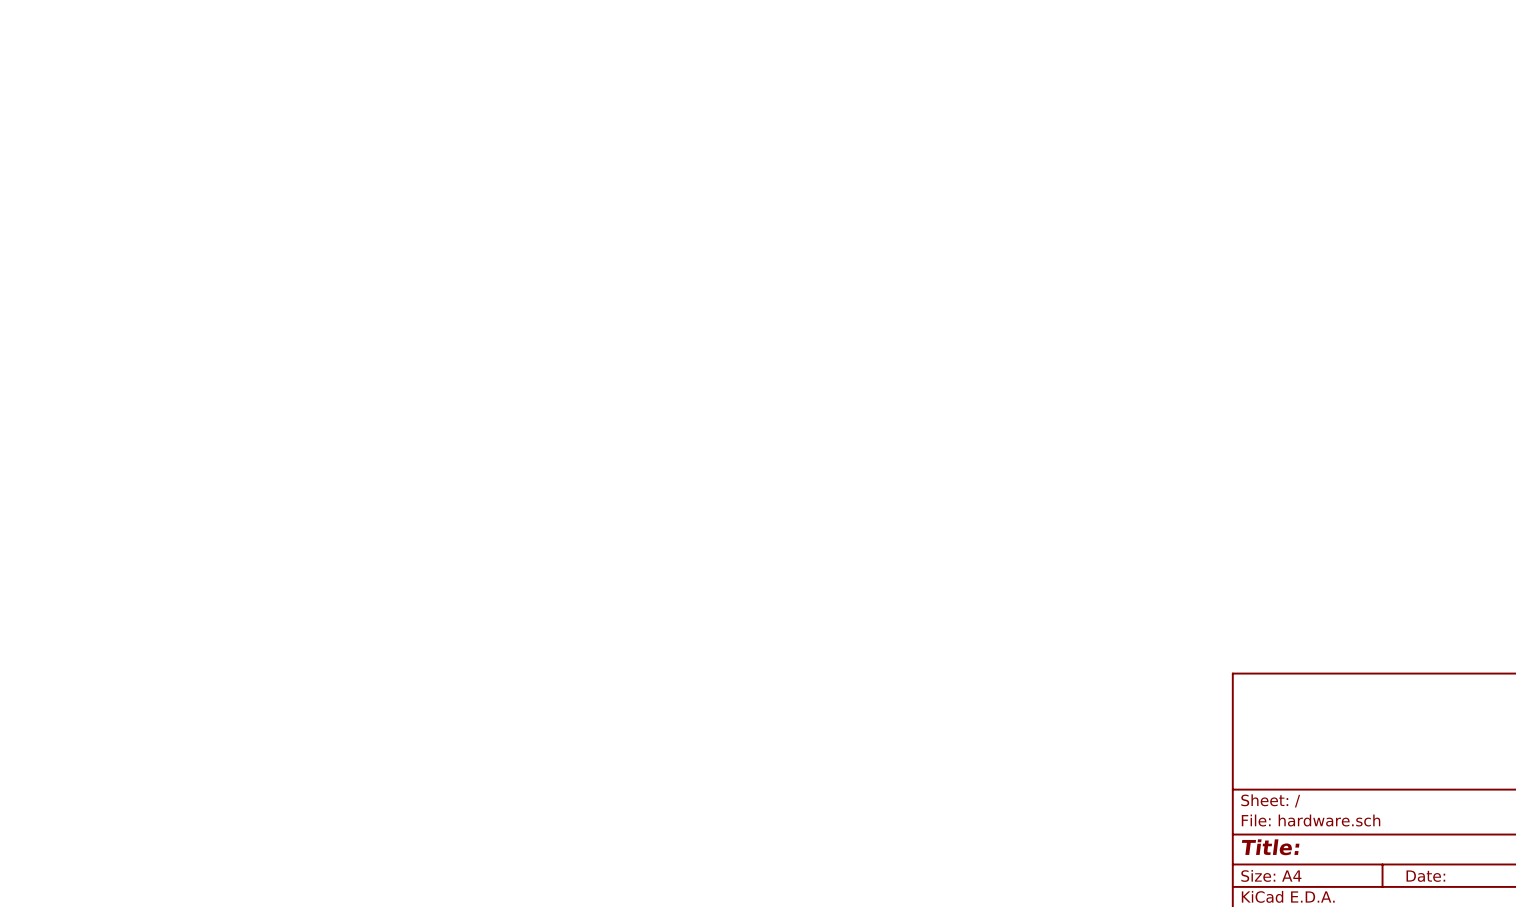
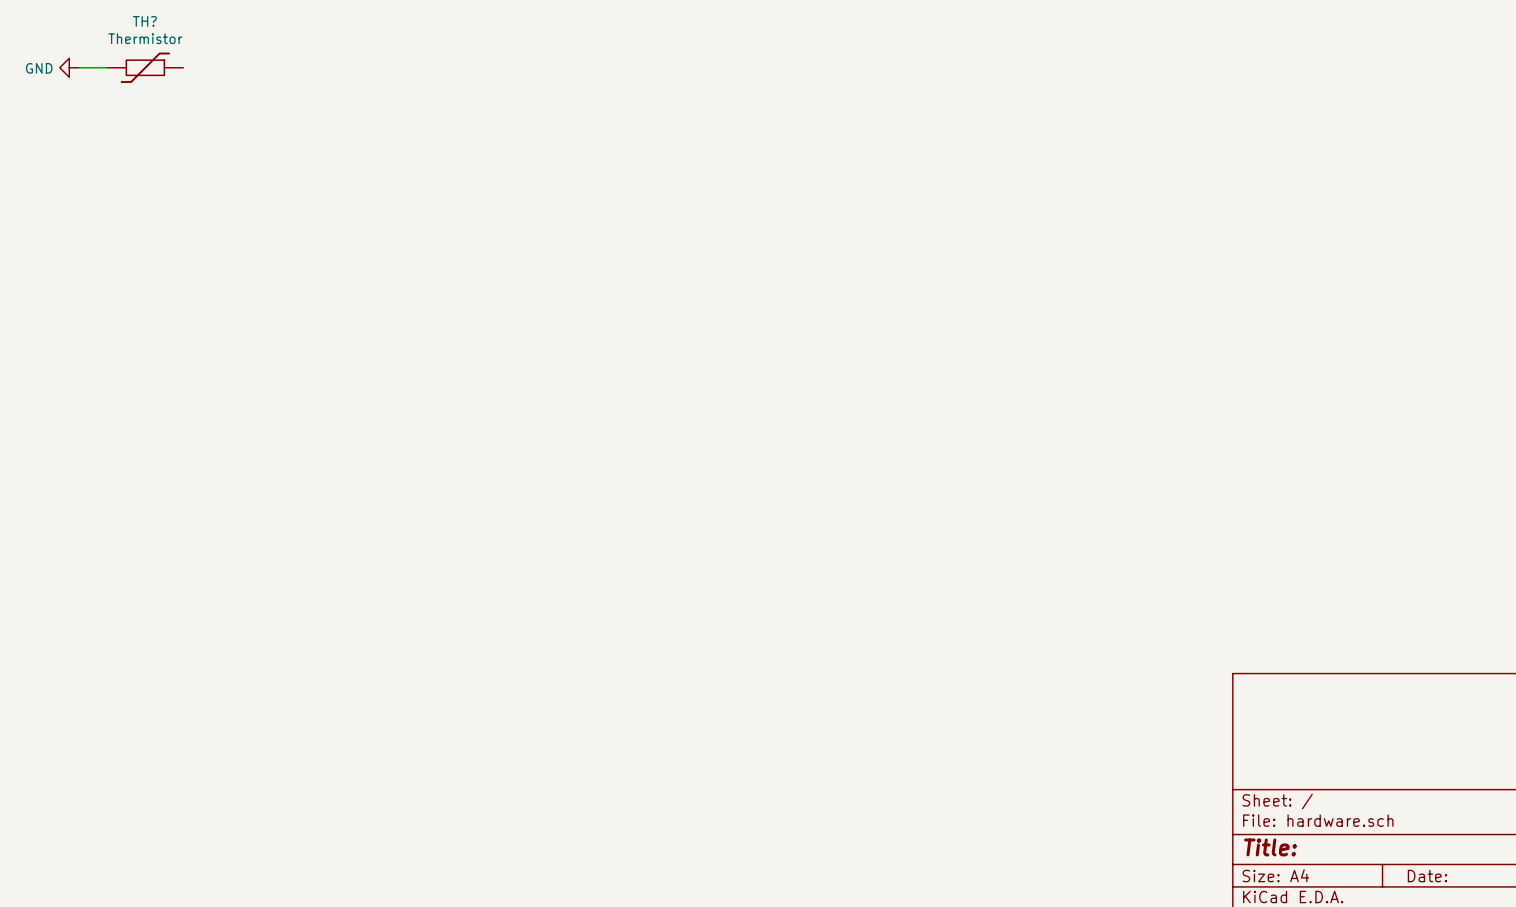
power symbol: none -> GND (69, 67)
wire: none -> (78, 67) (107, 67)
TH?: none -> Thermistor (145, 67)

